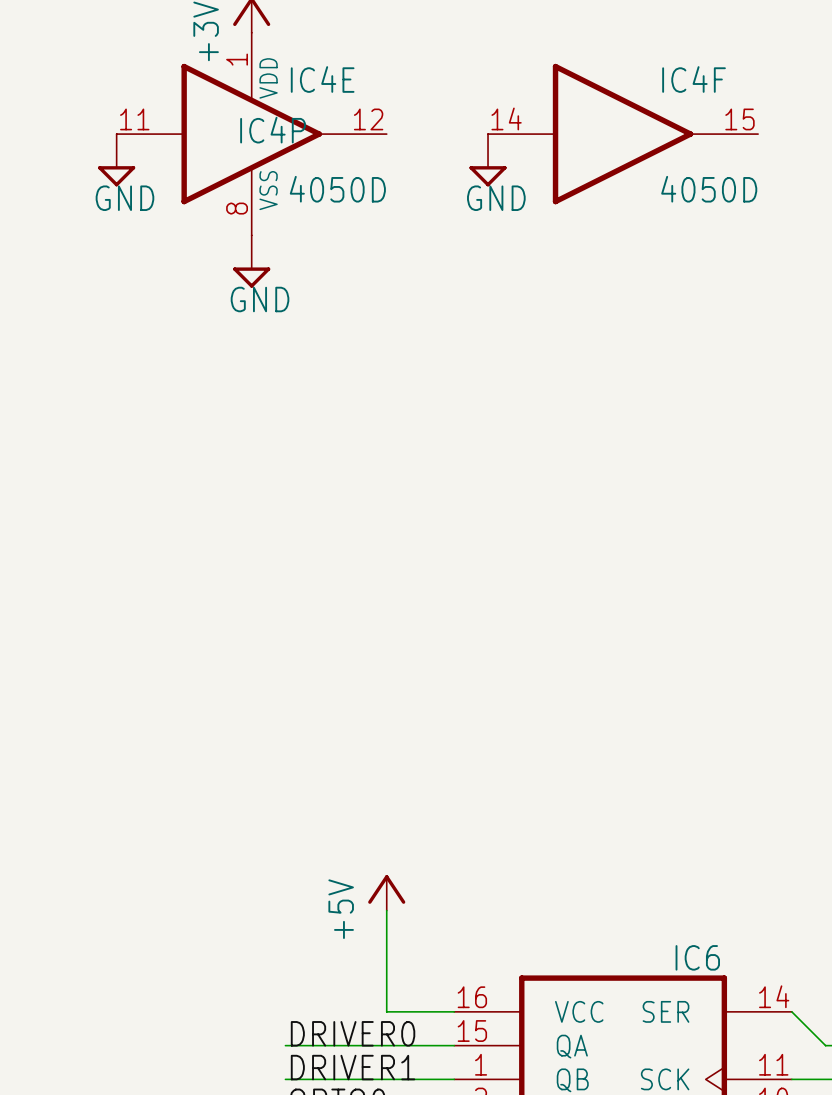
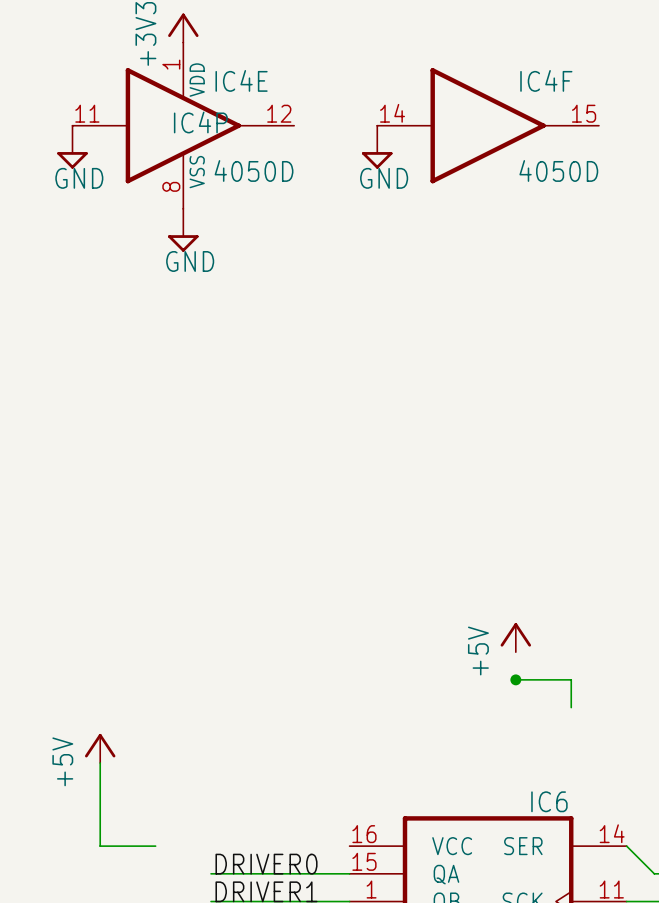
power symbol: none -> +5V (515, 637)
wire: none -> (515, 679) (571, 679) (571, 707)
junction: none -> (515, 679)
power symbol: none -> +5V (100, 748)
power symbol: +5V (386, 892) -> none
wire: (386, 910) (386, 1011) (454, 1011) -> (100, 762) (100, 846) (155, 846)

